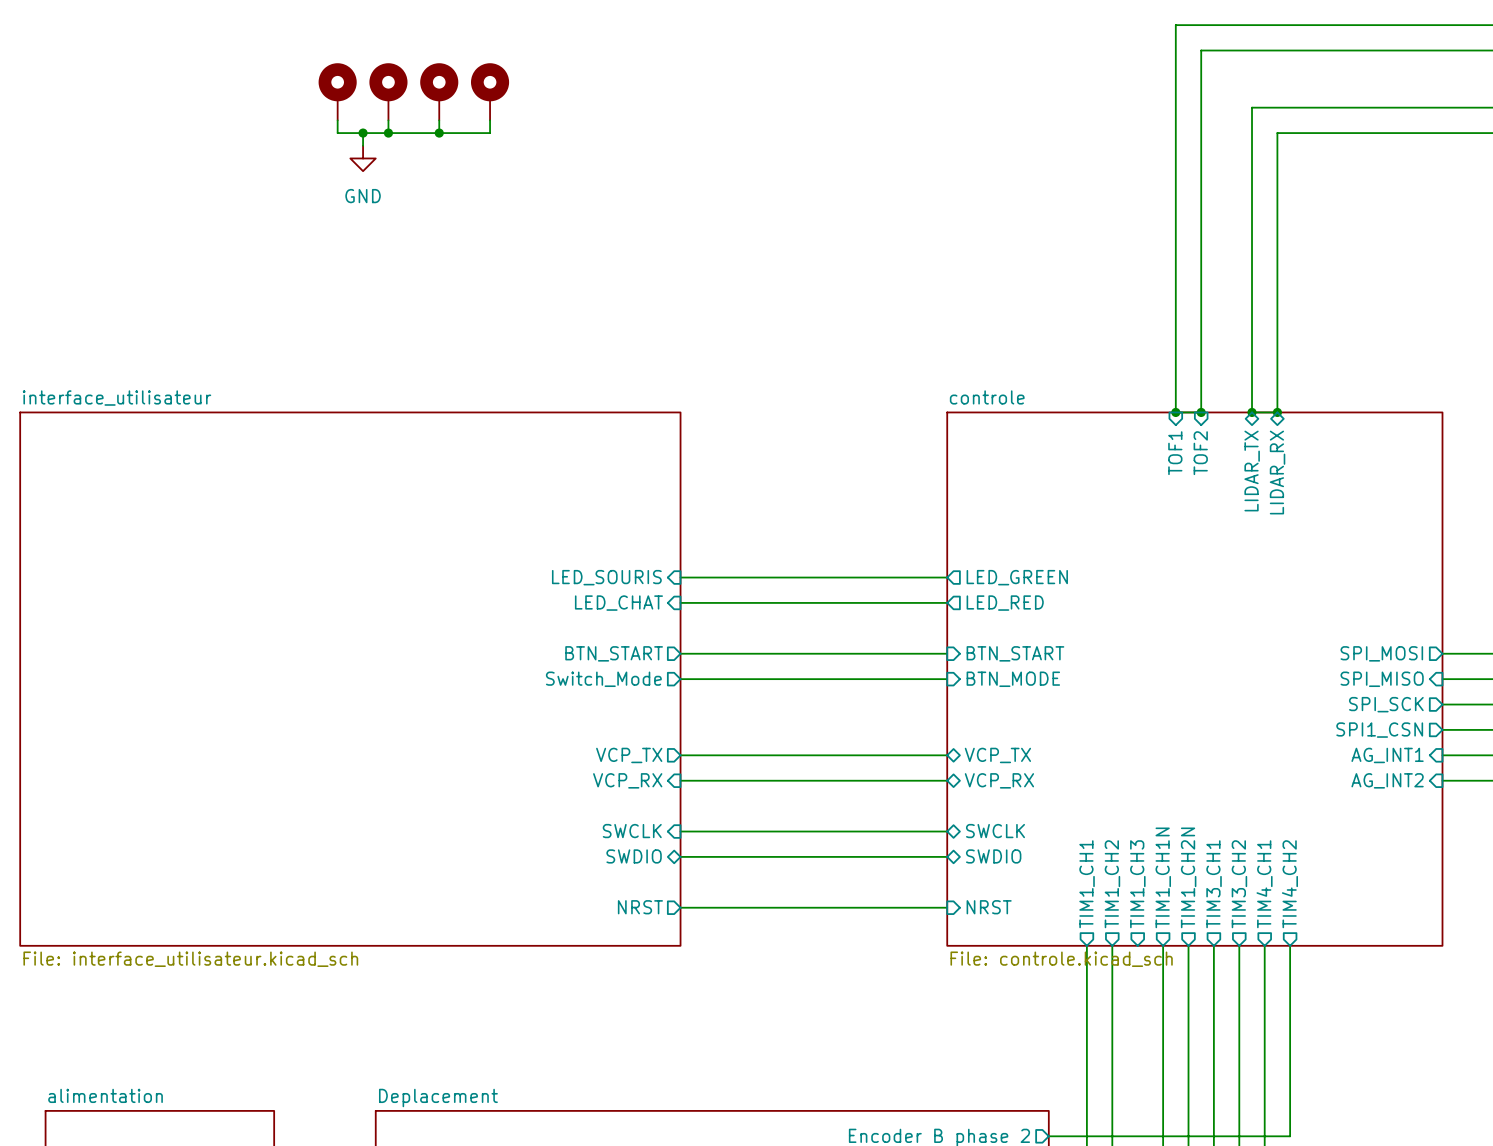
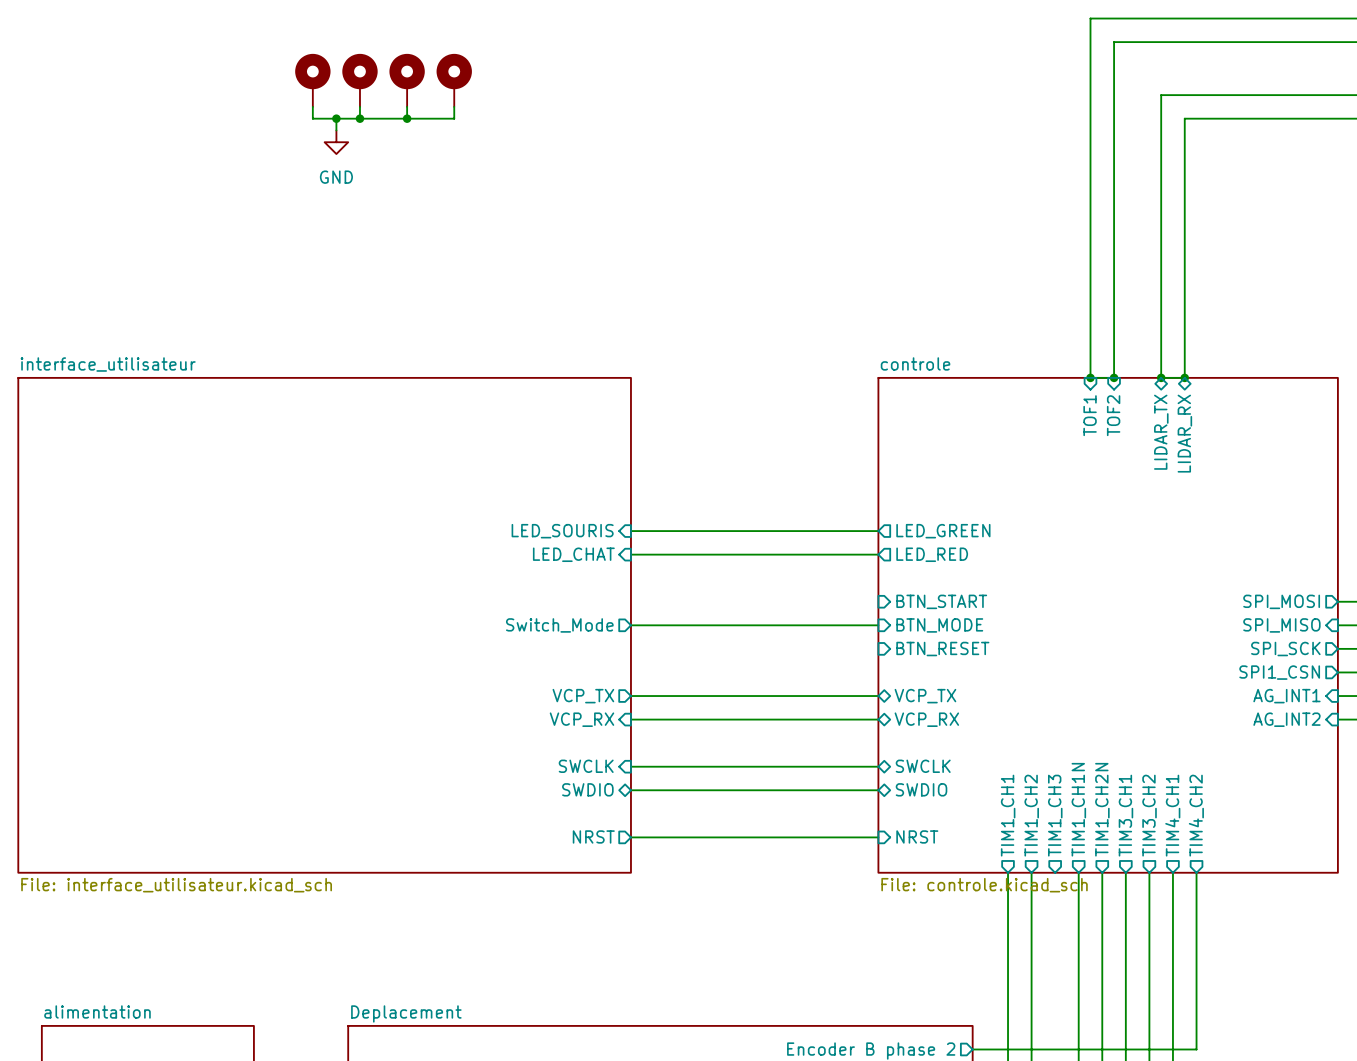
sheet pin: BTN_START (614, 653) -> none
wire: (680, 653) (947, 653) -> none
sheet pin: none -> BTN_RESET (942, 649)

